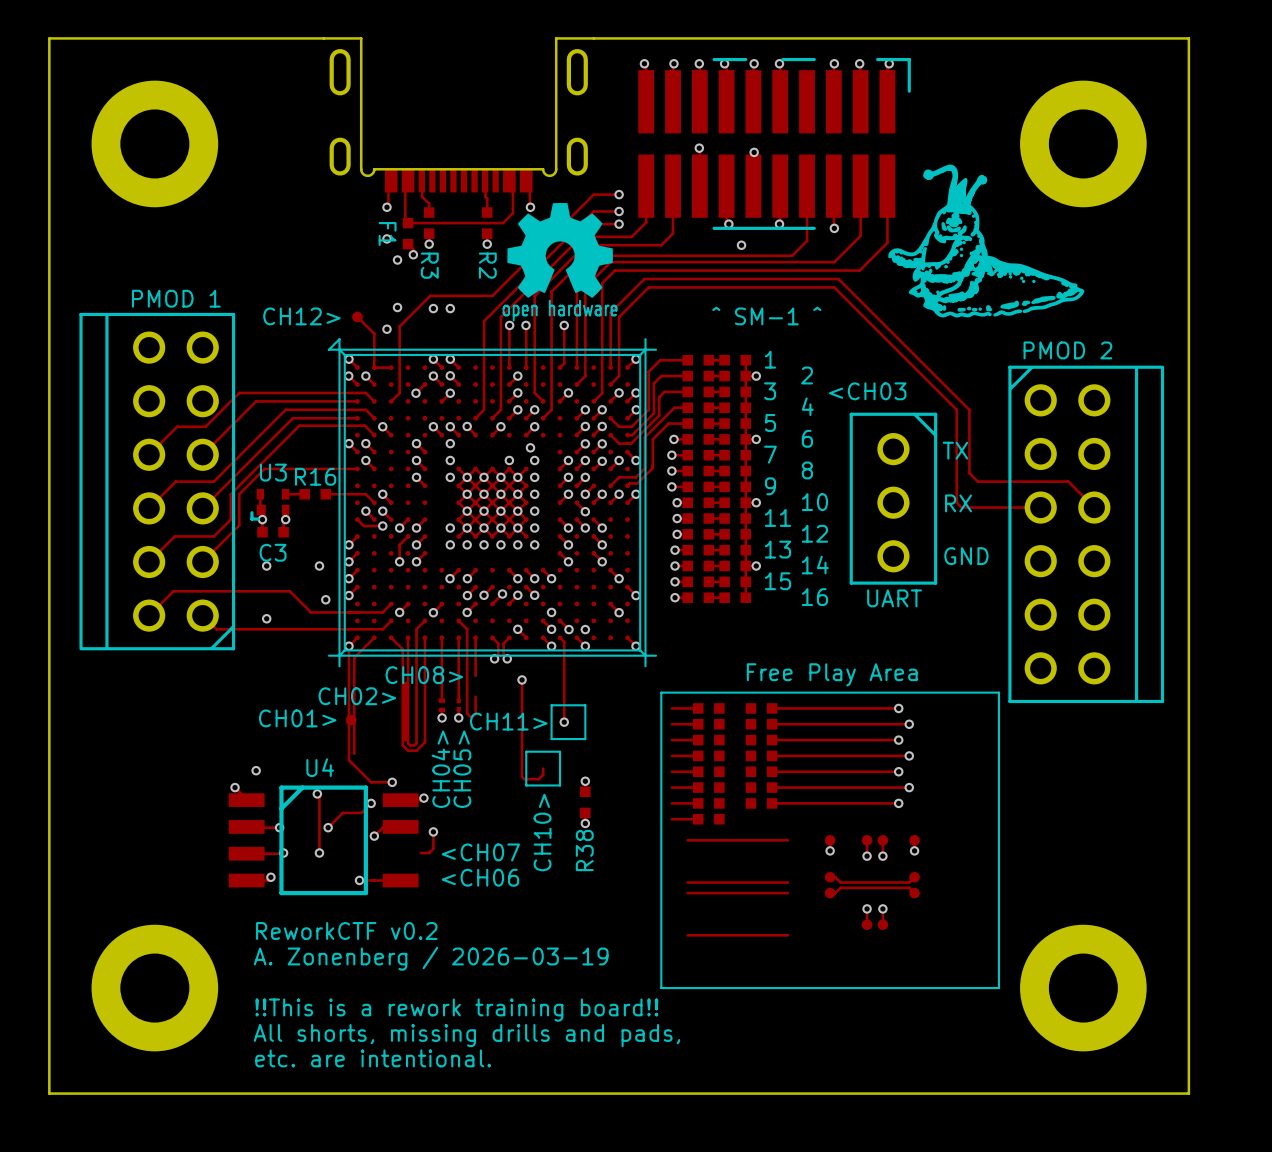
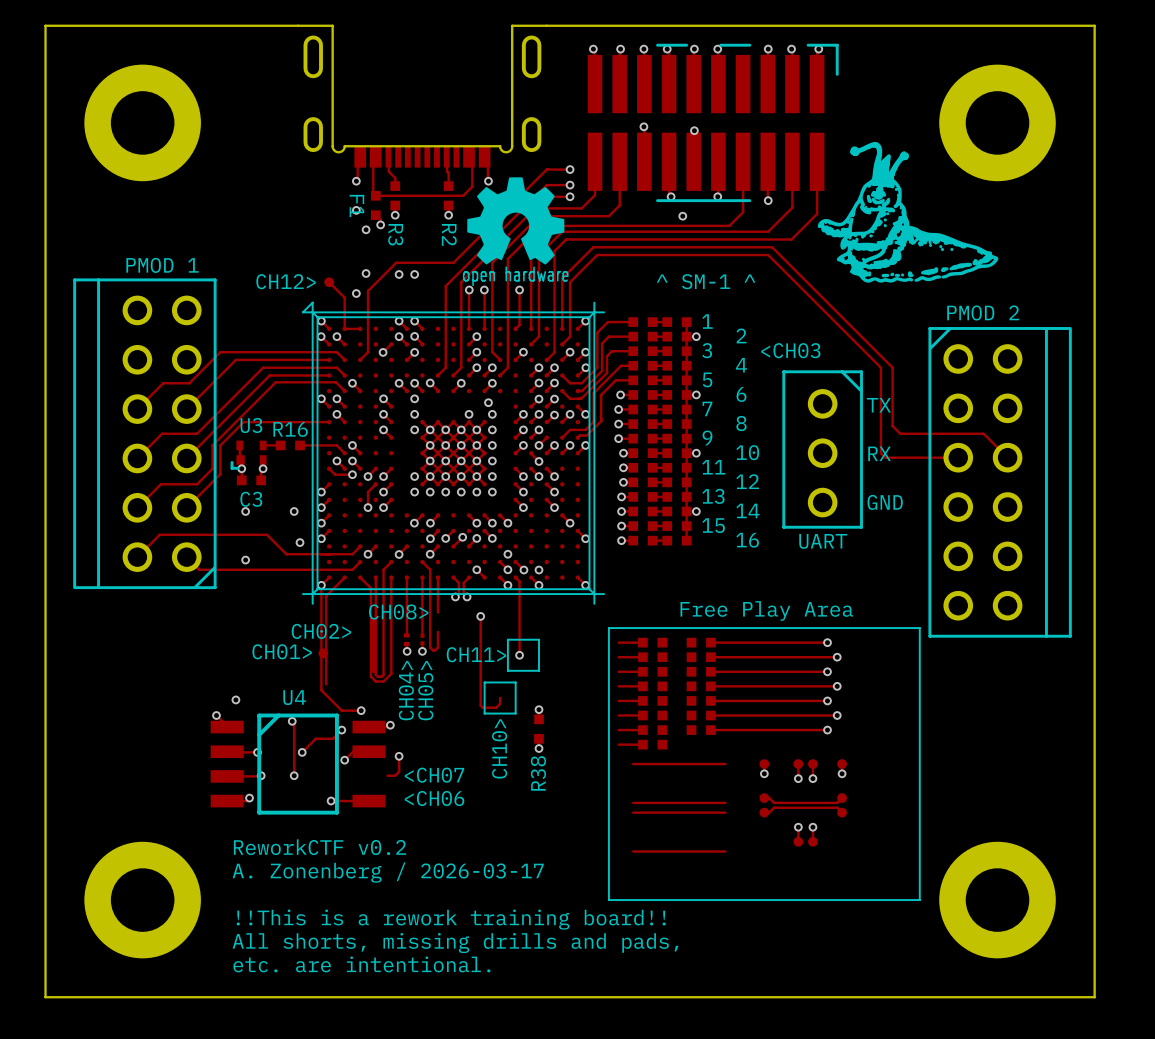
track: (610, 604) (619, 612) -> none
via: (619, 612) -> none
text: A. Zonenberg / 2026-03-19 (431, 958) -> A. Zonenberg / 2026-03-17 (388, 872)

